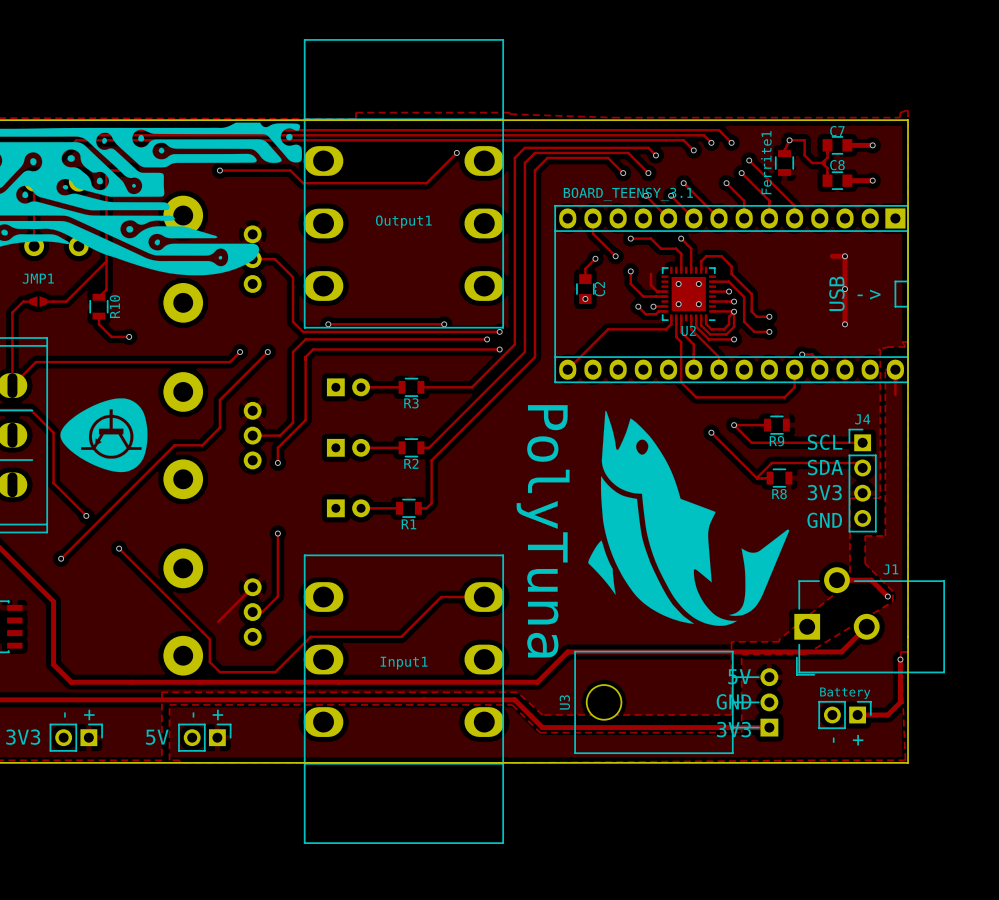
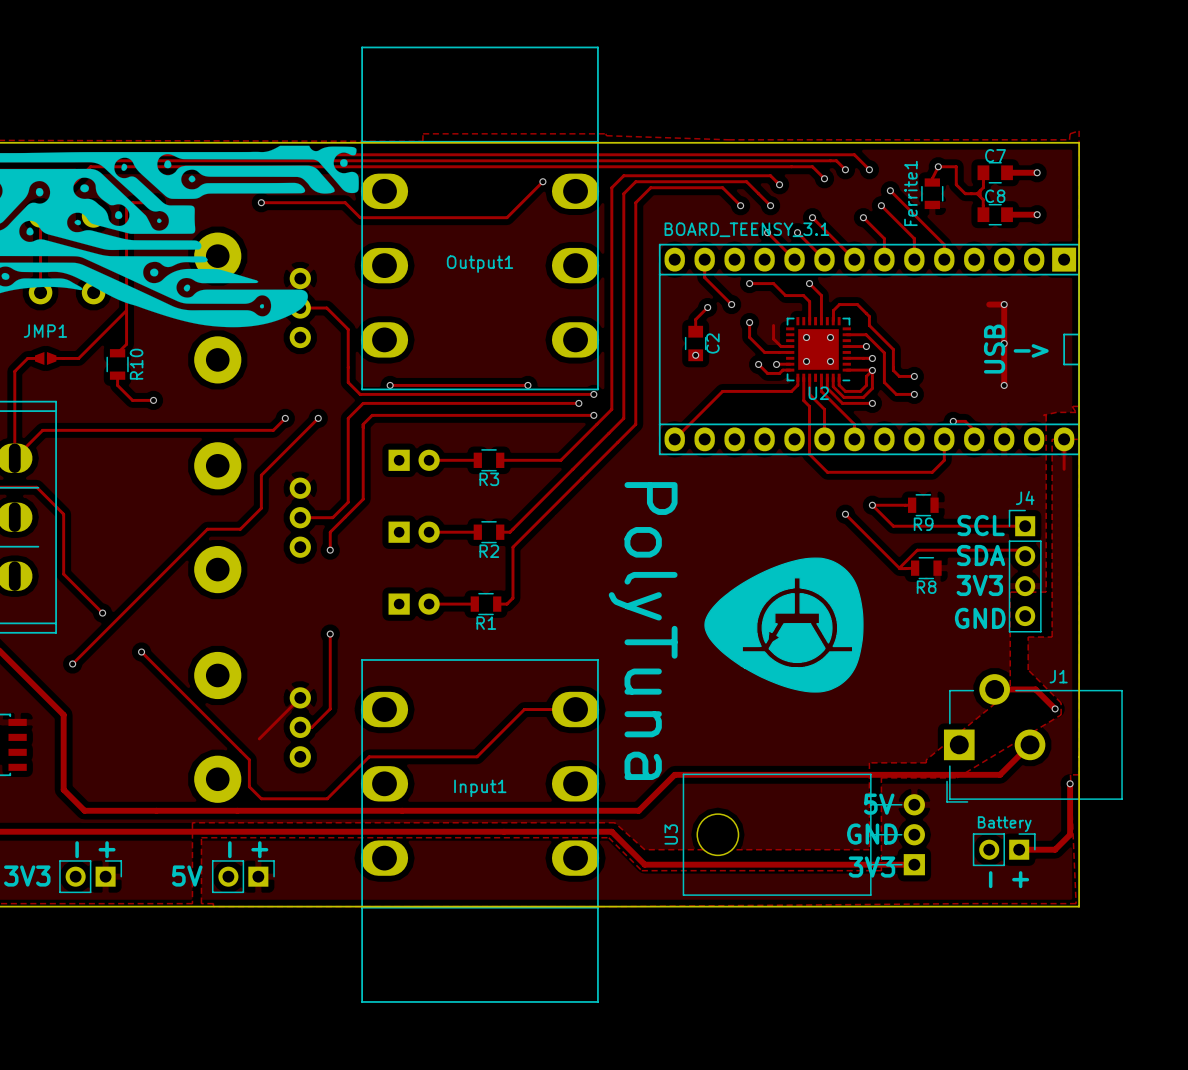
drawing: [60, 398, 148, 473] -> none
drawing: [588, 410, 790, 626] -> none
drawing: none -> [704, 557, 864, 693]

